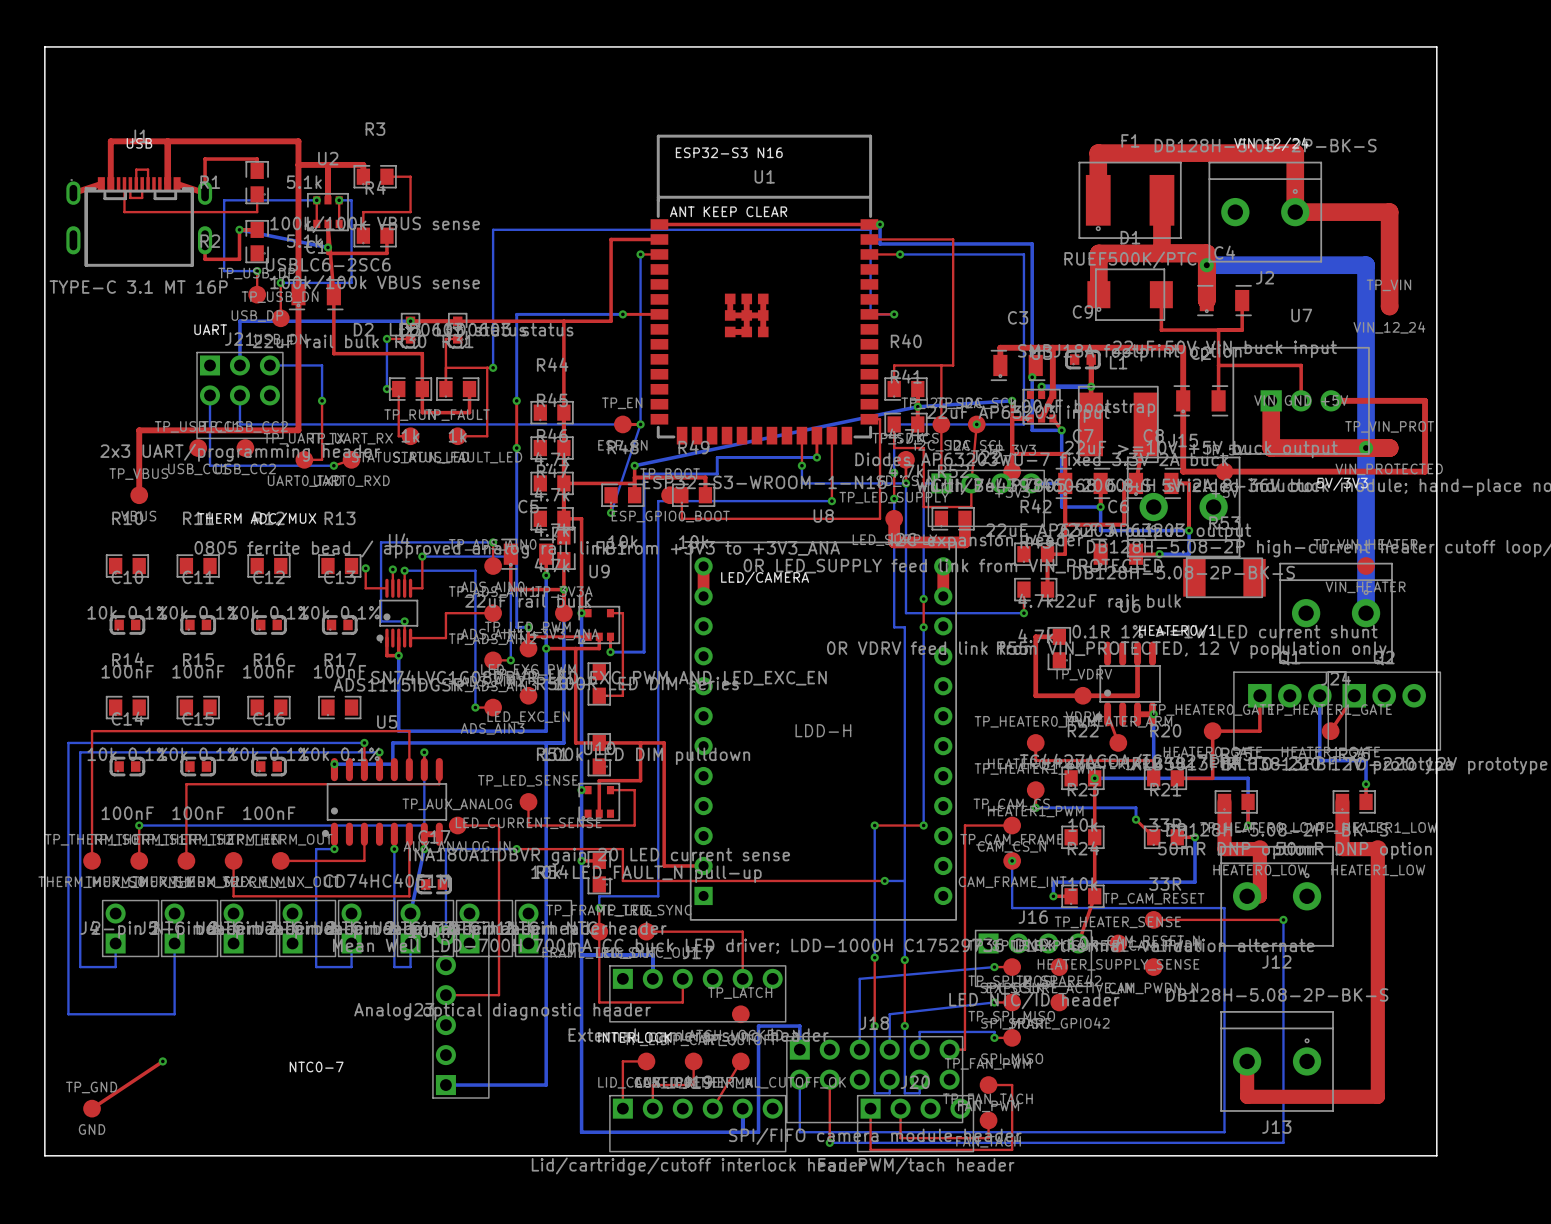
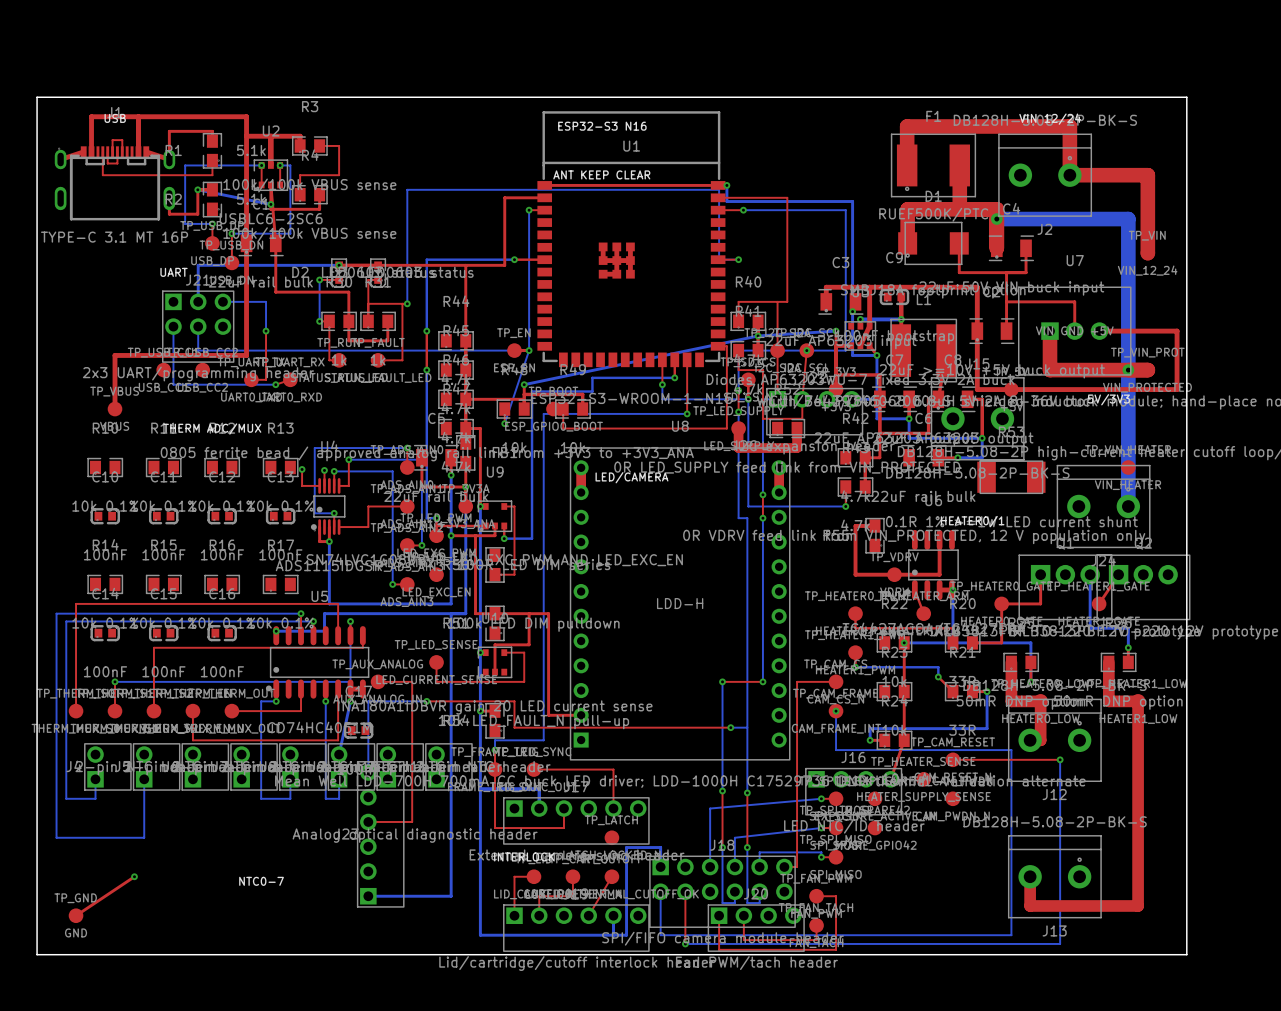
board edge: (44, 117) (44, 46) (1436, 46) (1436, 117) -> (37, 97) (1186, 97)

